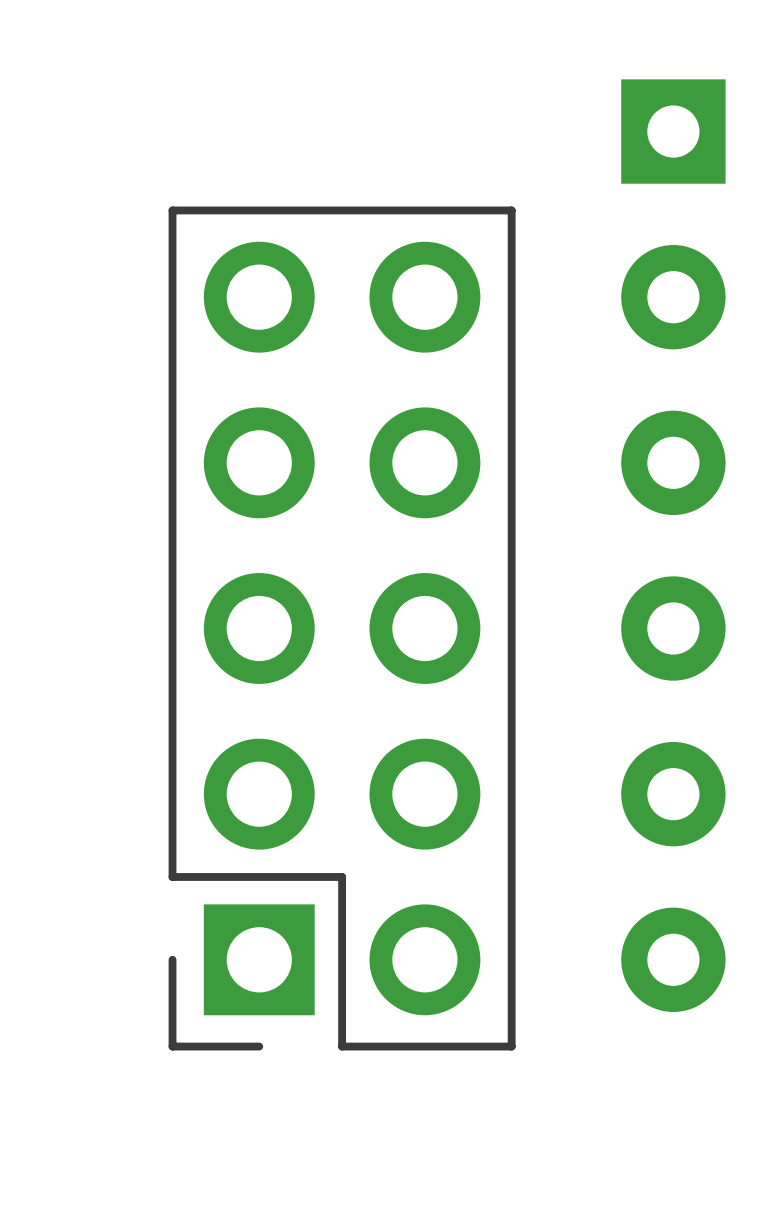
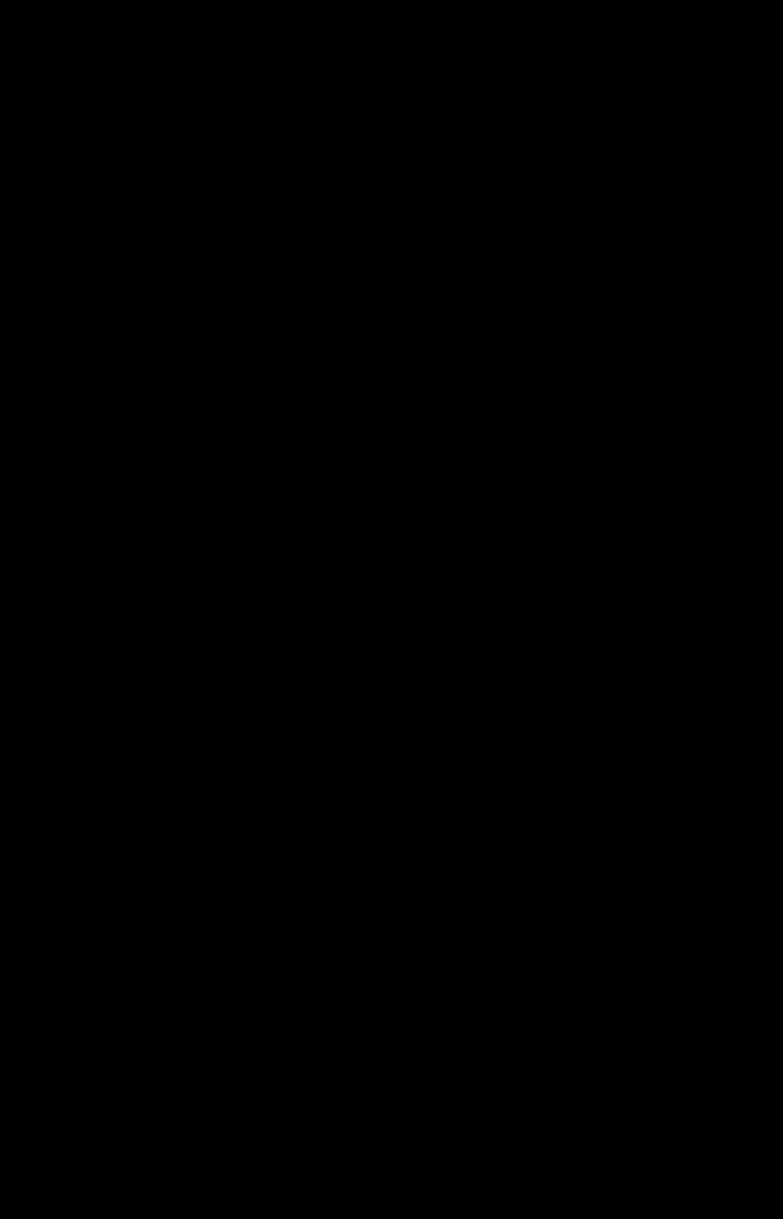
part: (673, 545) -> none
part: (342, 628) -> none

